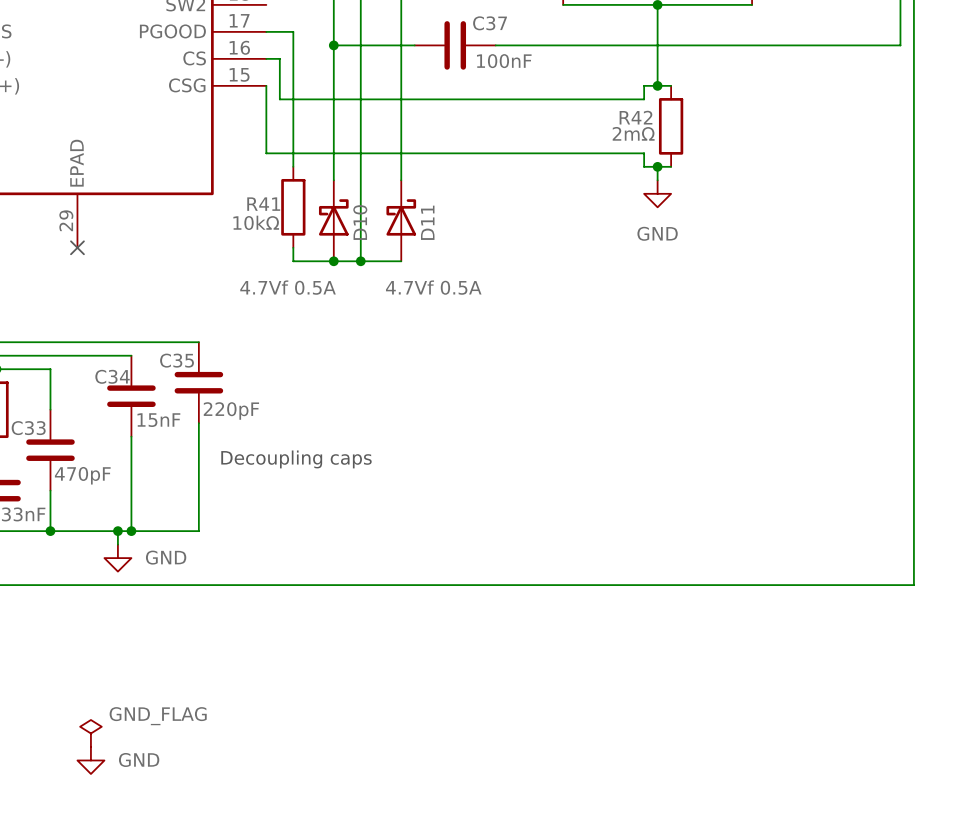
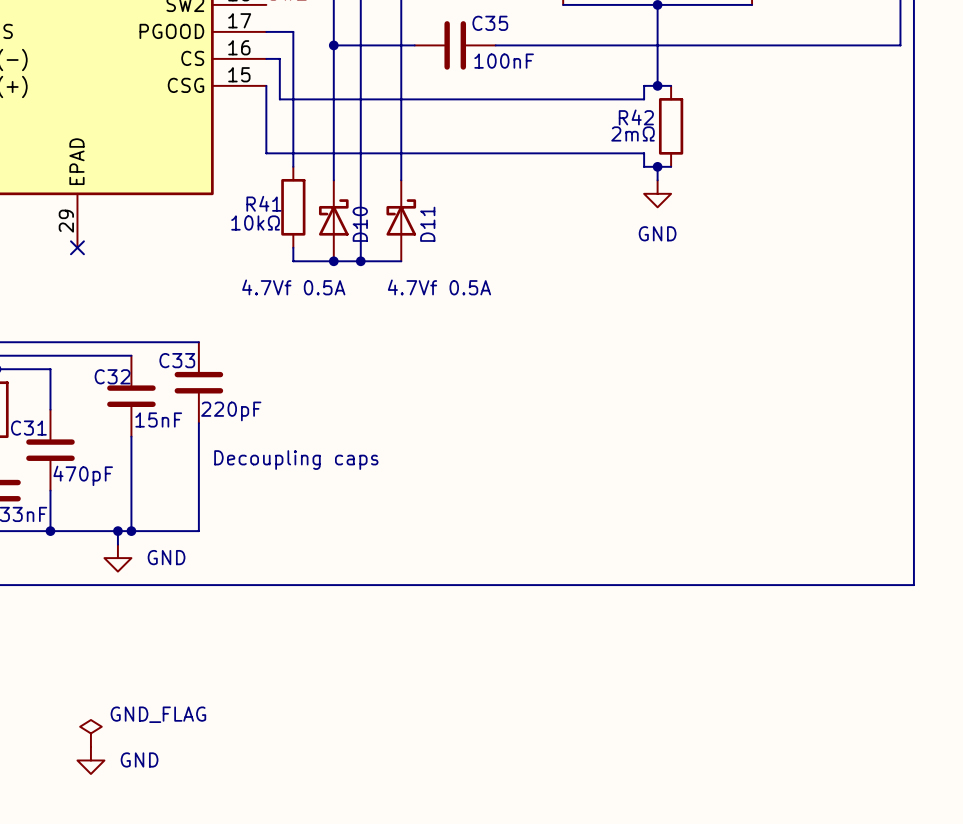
C37 name: C37 (490, 23) -> C35 (490, 23)
C35 name: C35 (177, 360) -> C33 (177, 360)
C34 name: C34 (112, 376) -> C32 (112, 376)
C33 name: C33 (28, 428) -> C31 (28, 428)

